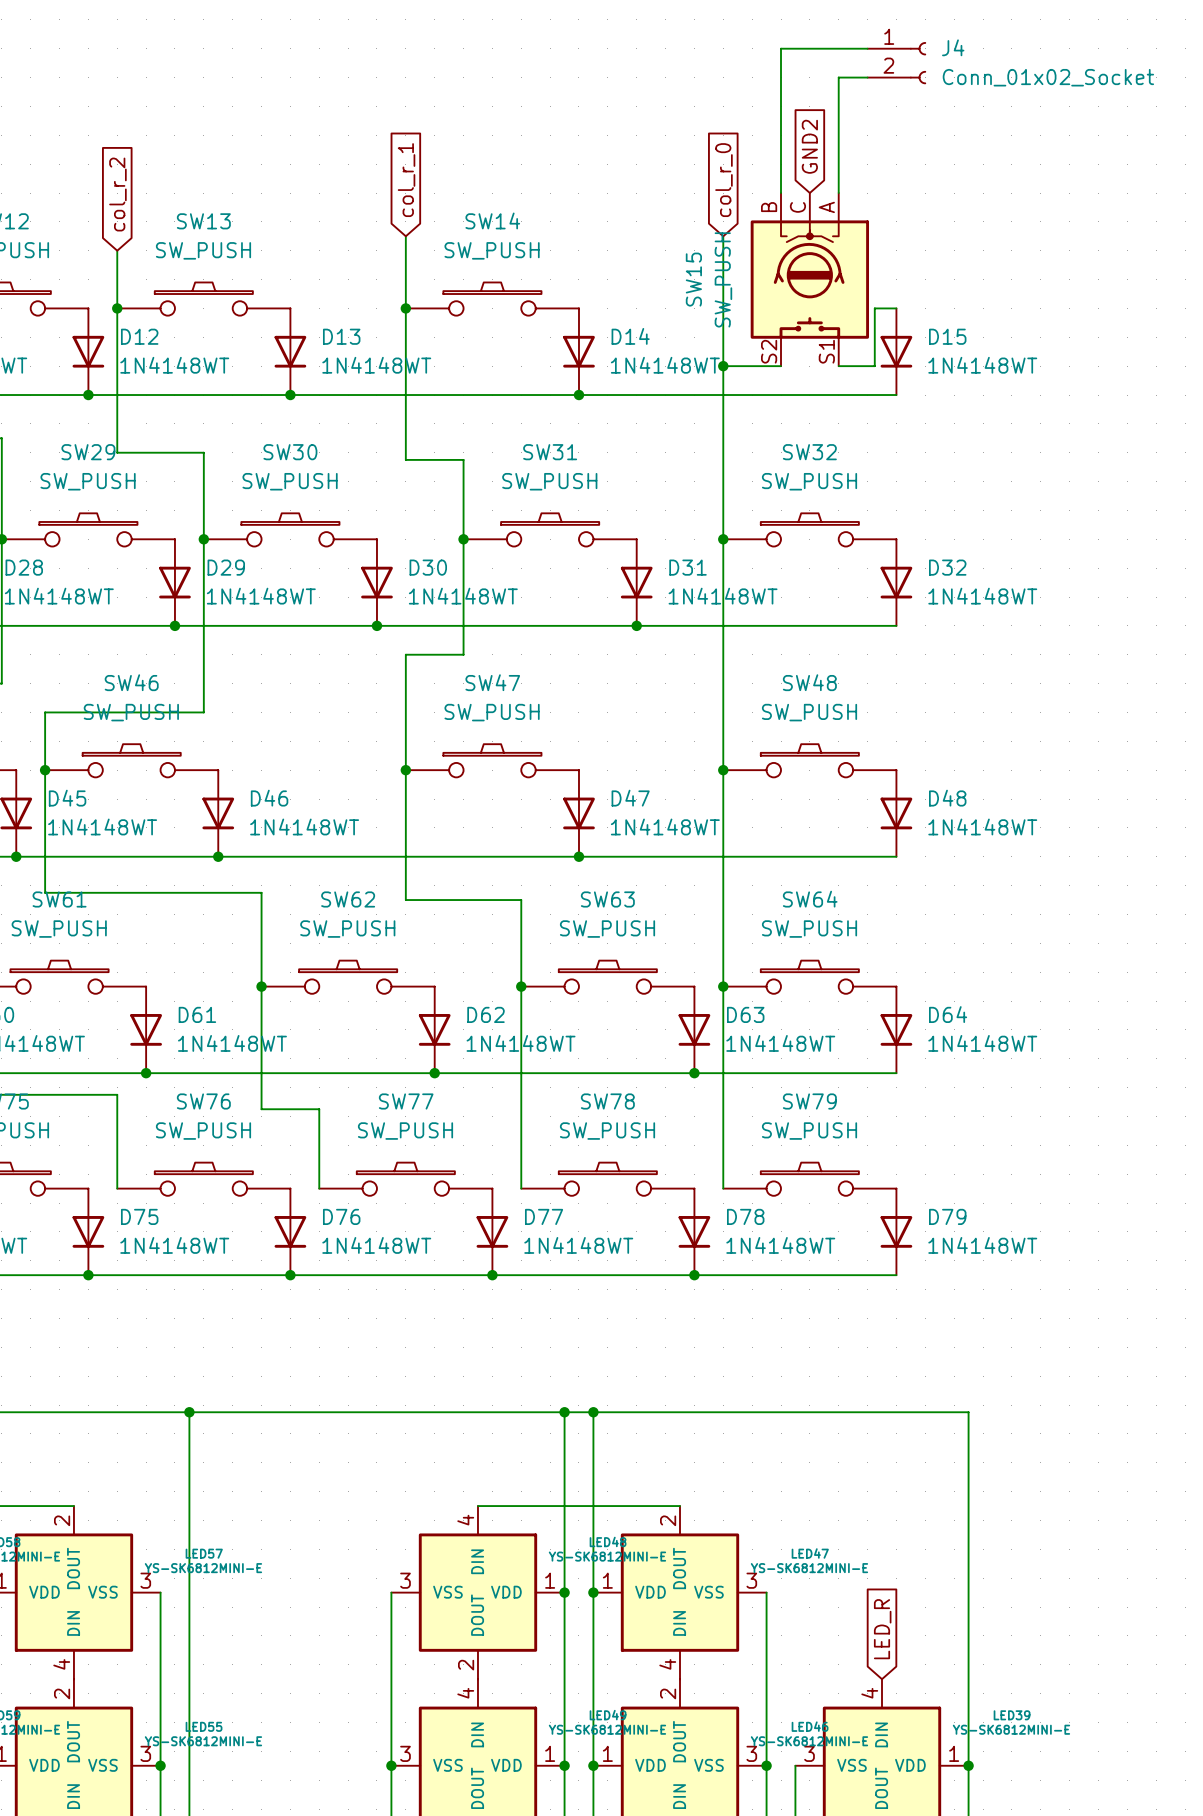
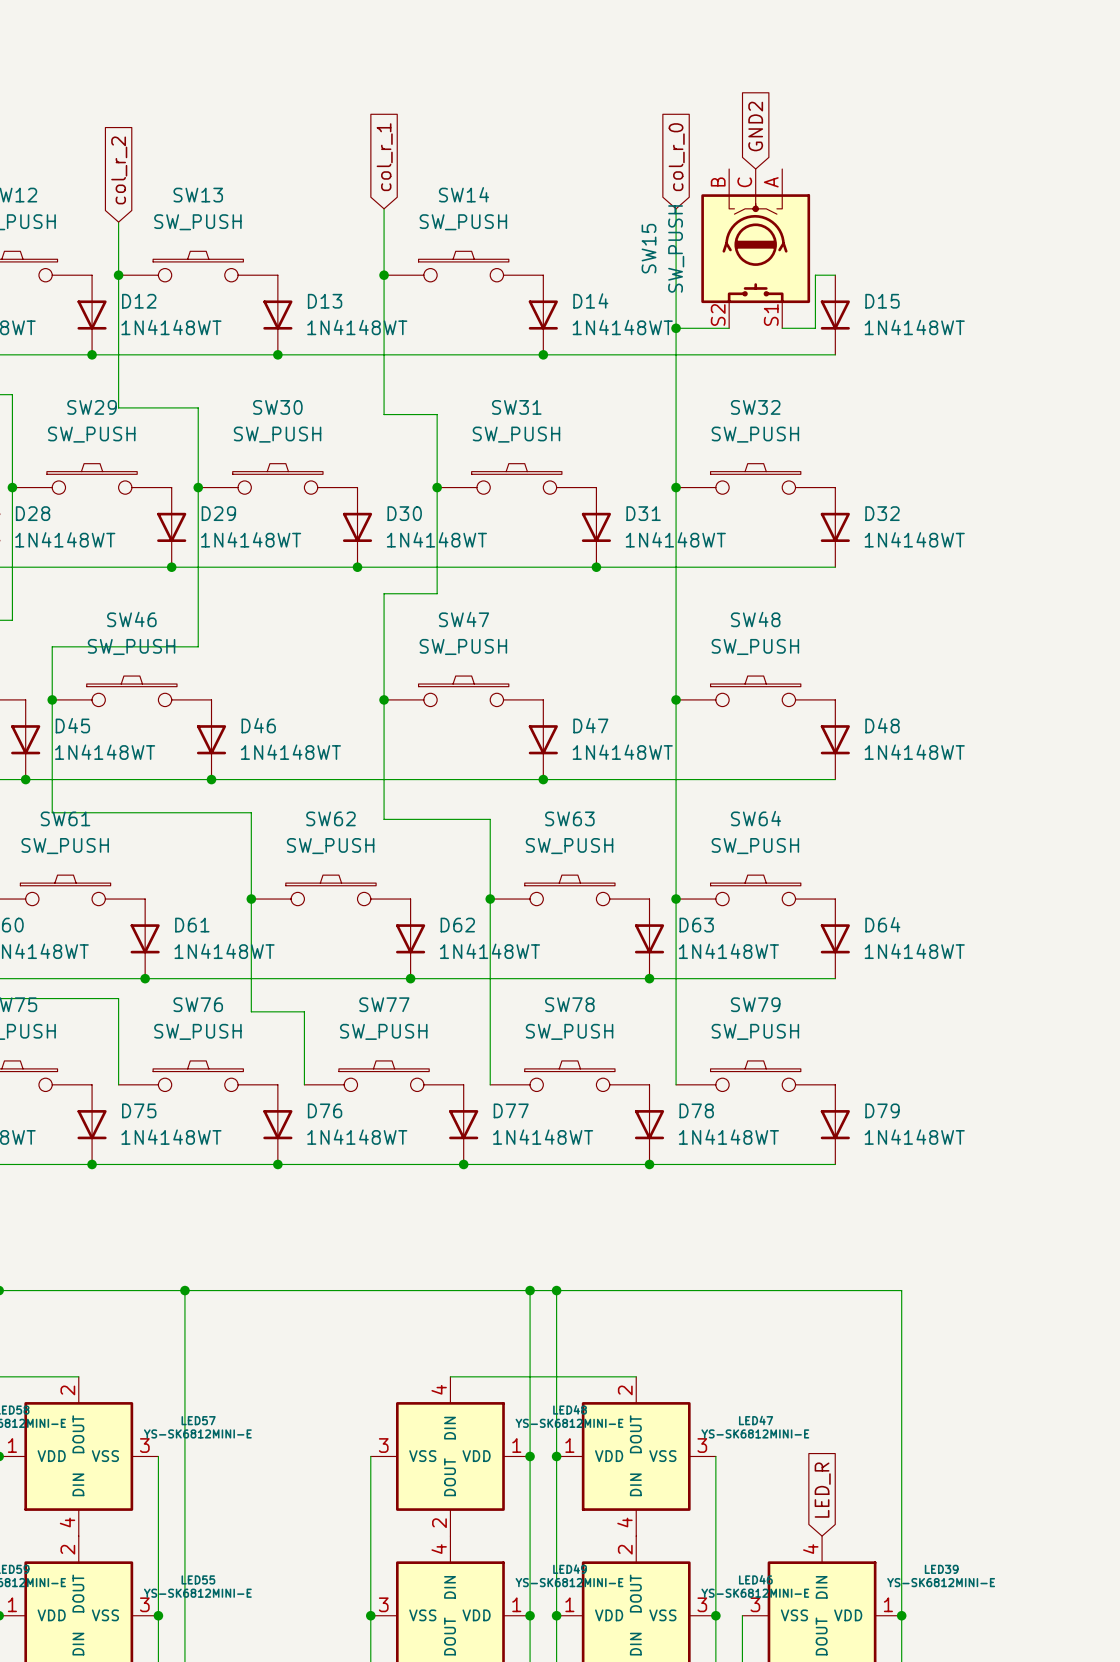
wire: (867, 48) (781, 48) (781, 193) -> none
J4: Conn_01x02_Socket (896, 63) -> none
wire: (867, 77) (838, 77) (838, 193) -> none

